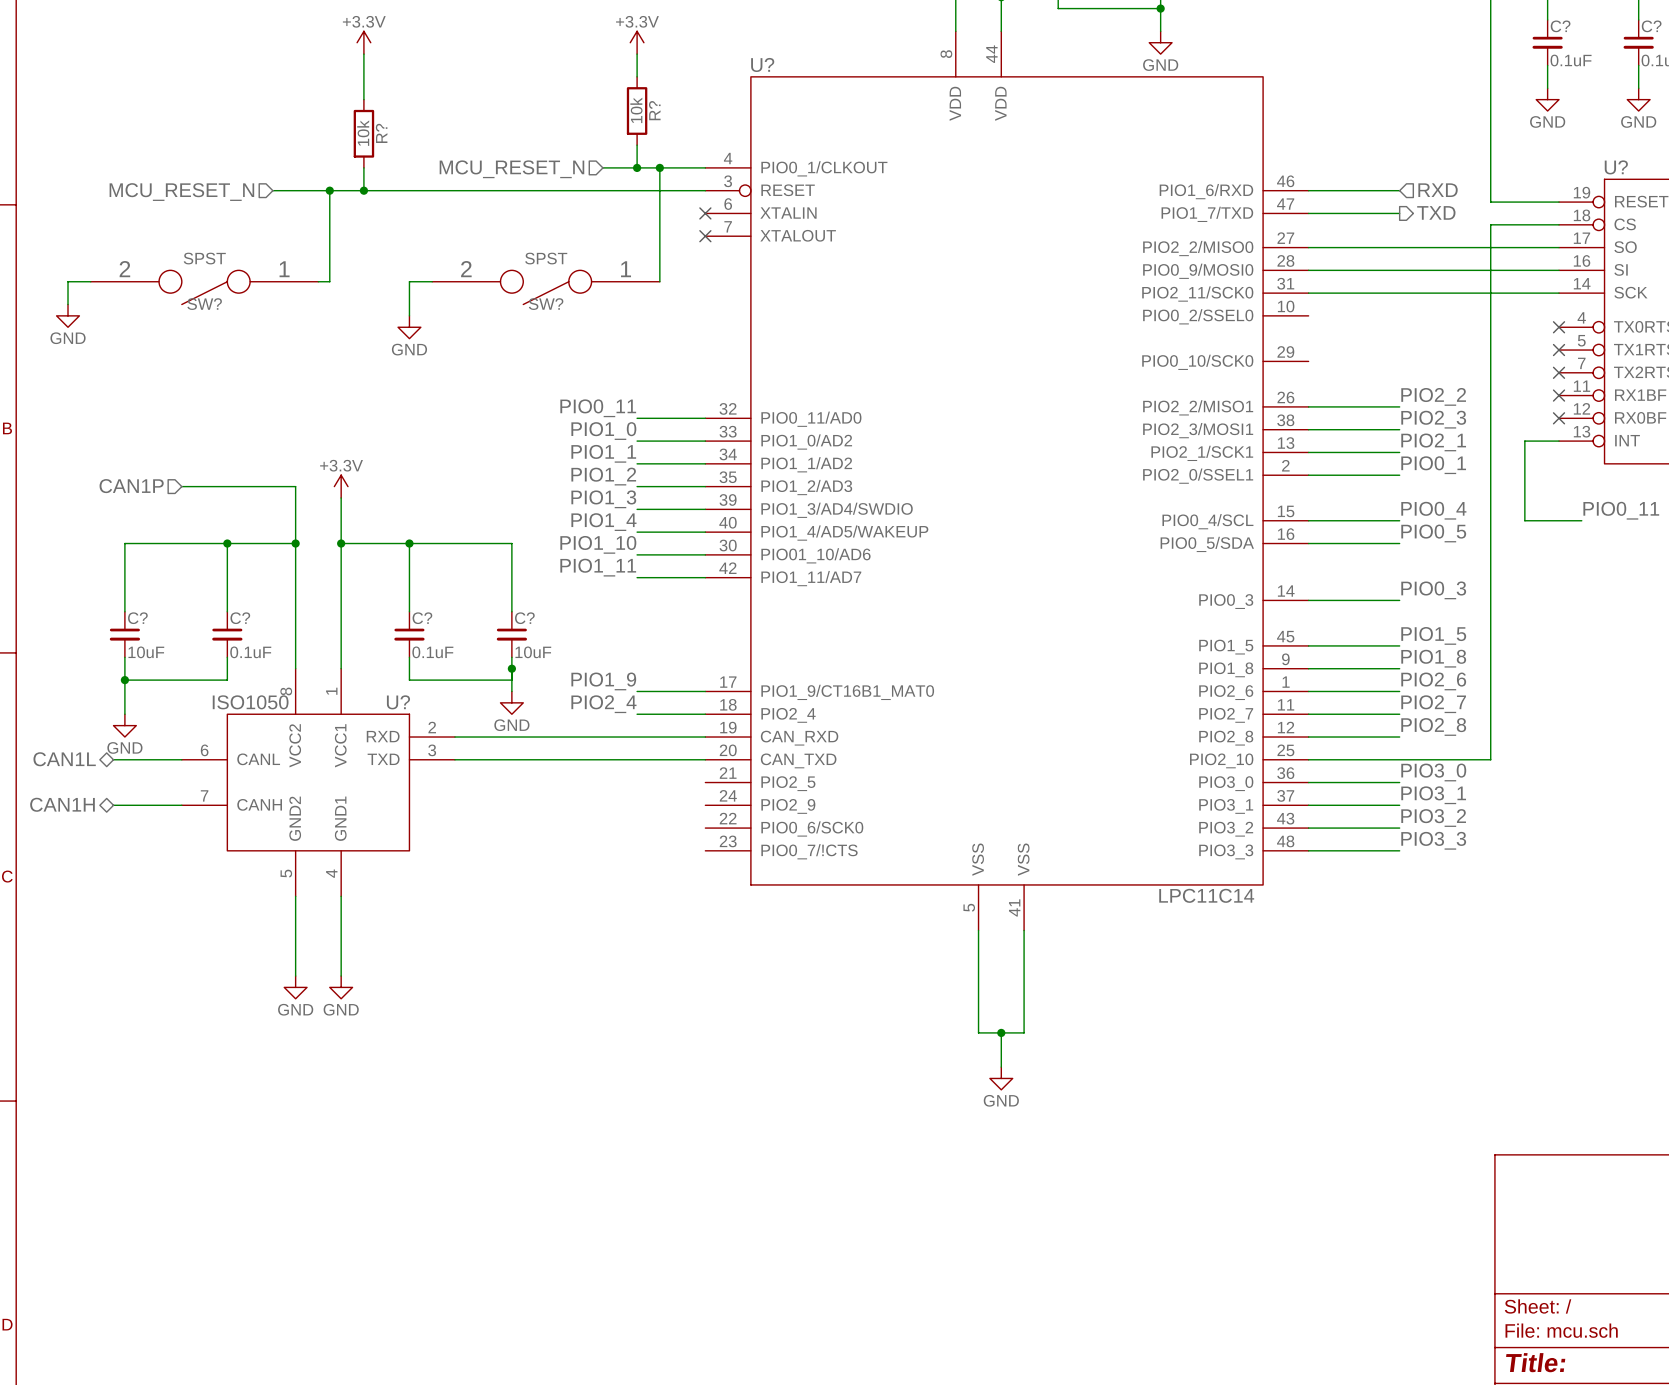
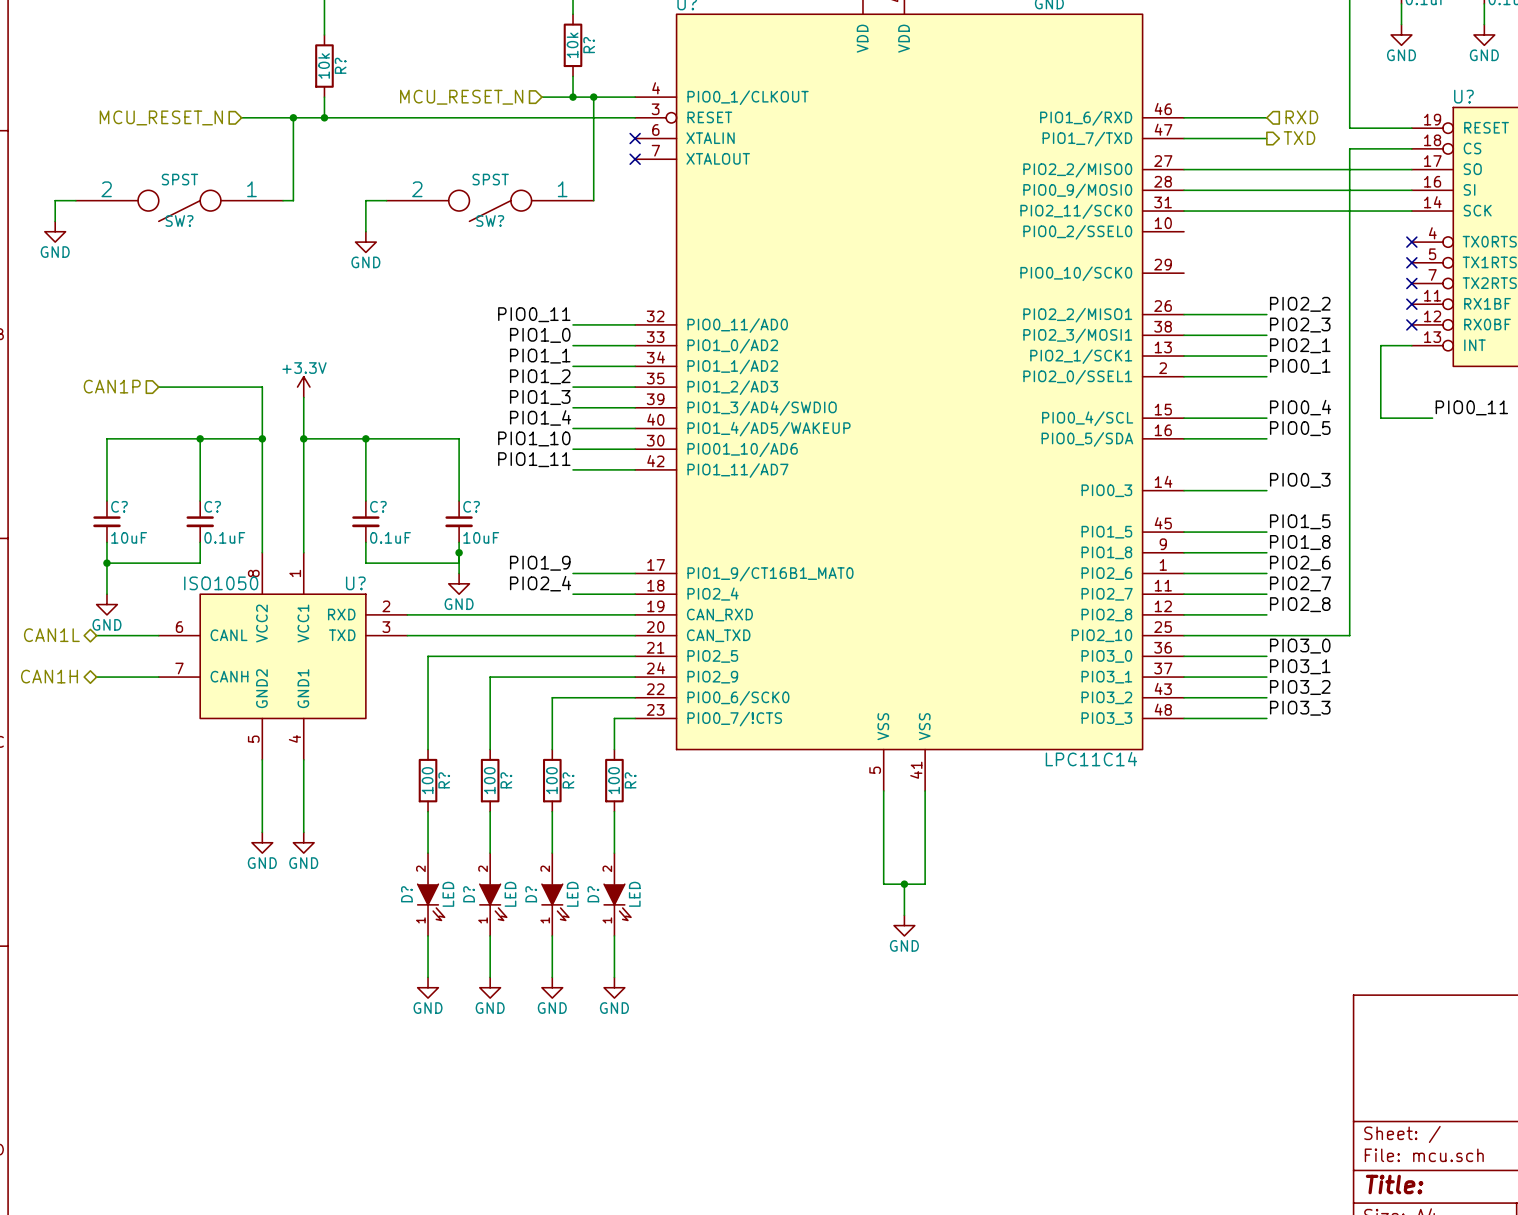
wire: none -> (635, 656) (428, 656) (428, 749)
wire: none -> (635, 677) (490, 677) (490, 749)
wire: none -> (635, 697) (552, 697) (552, 749)
wire: none -> (635, 718) (614, 718) (614, 749)
R?: none -> 100 (428, 780)
R?: none -> 100 (490, 780)
R?: none -> 100 (552, 780)
R?: none -> 100 (614, 780)
wire: none -> (428, 811) (428, 853)
wire: none -> (490, 811) (490, 853)
wire: none -> (552, 811) (552, 853)
wire: none -> (614, 811) (614, 853)
D?: none -> LED (431, 894)
D?: none -> LED (493, 894)
D?: none -> LED (555, 894)
D?: none -> LED (617, 894)
wire: none -> (428, 935) (428, 977)
wire: none -> (490, 935) (490, 977)
wire: none -> (552, 935) (552, 977)
wire: none -> (614, 935) (614, 977)
power symbol: none -> GND (428, 987)
power symbol: none -> GND (490, 987)
power symbol: none -> GND (552, 987)
power symbol: none -> GND (614, 987)

